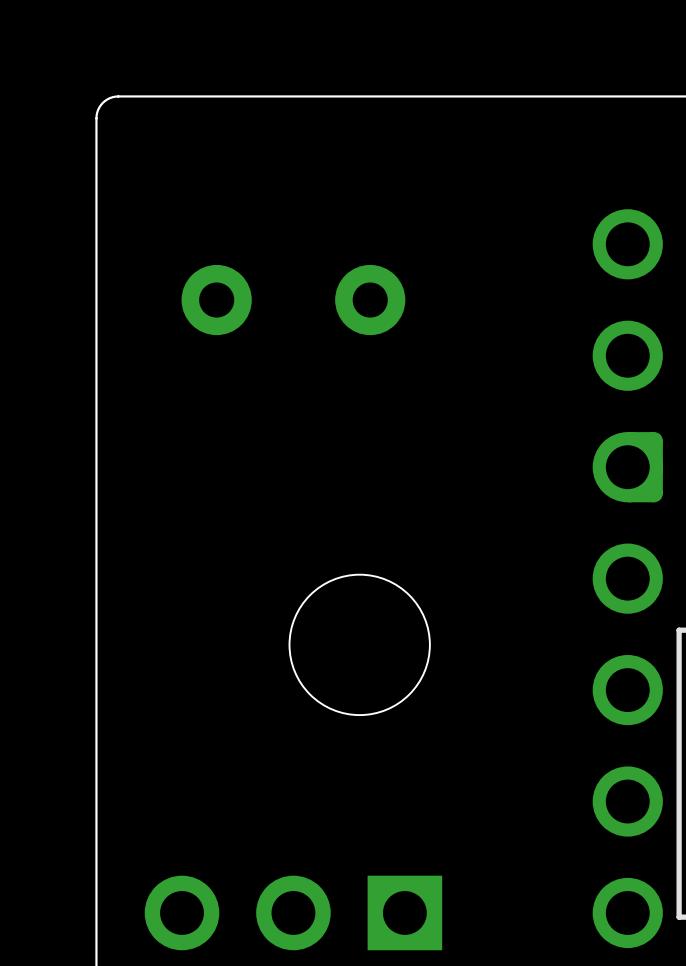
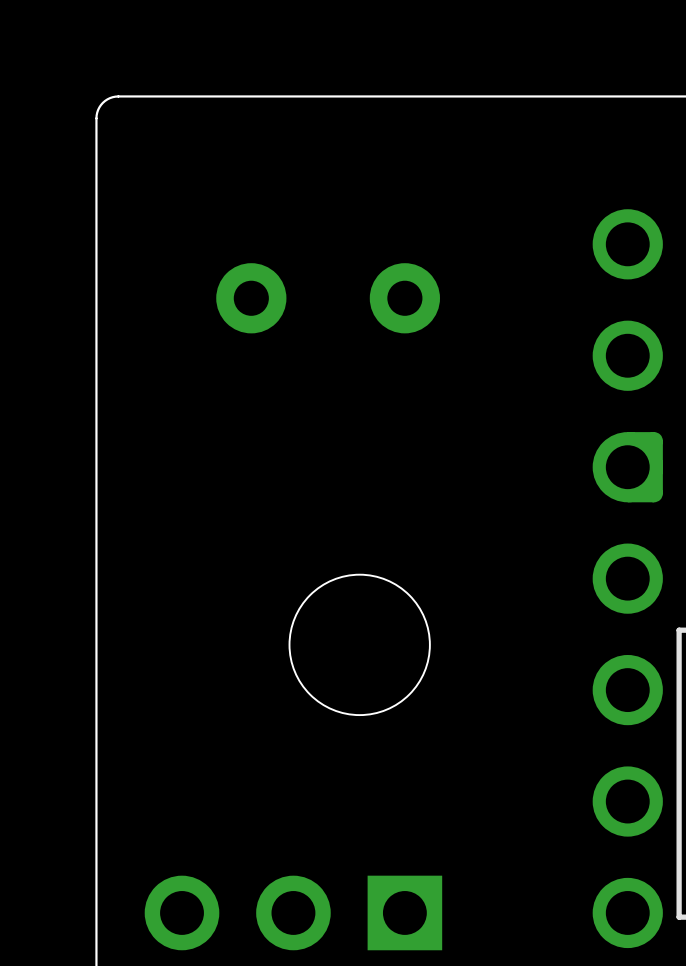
part position: (293, 300) -> (328, 298)

